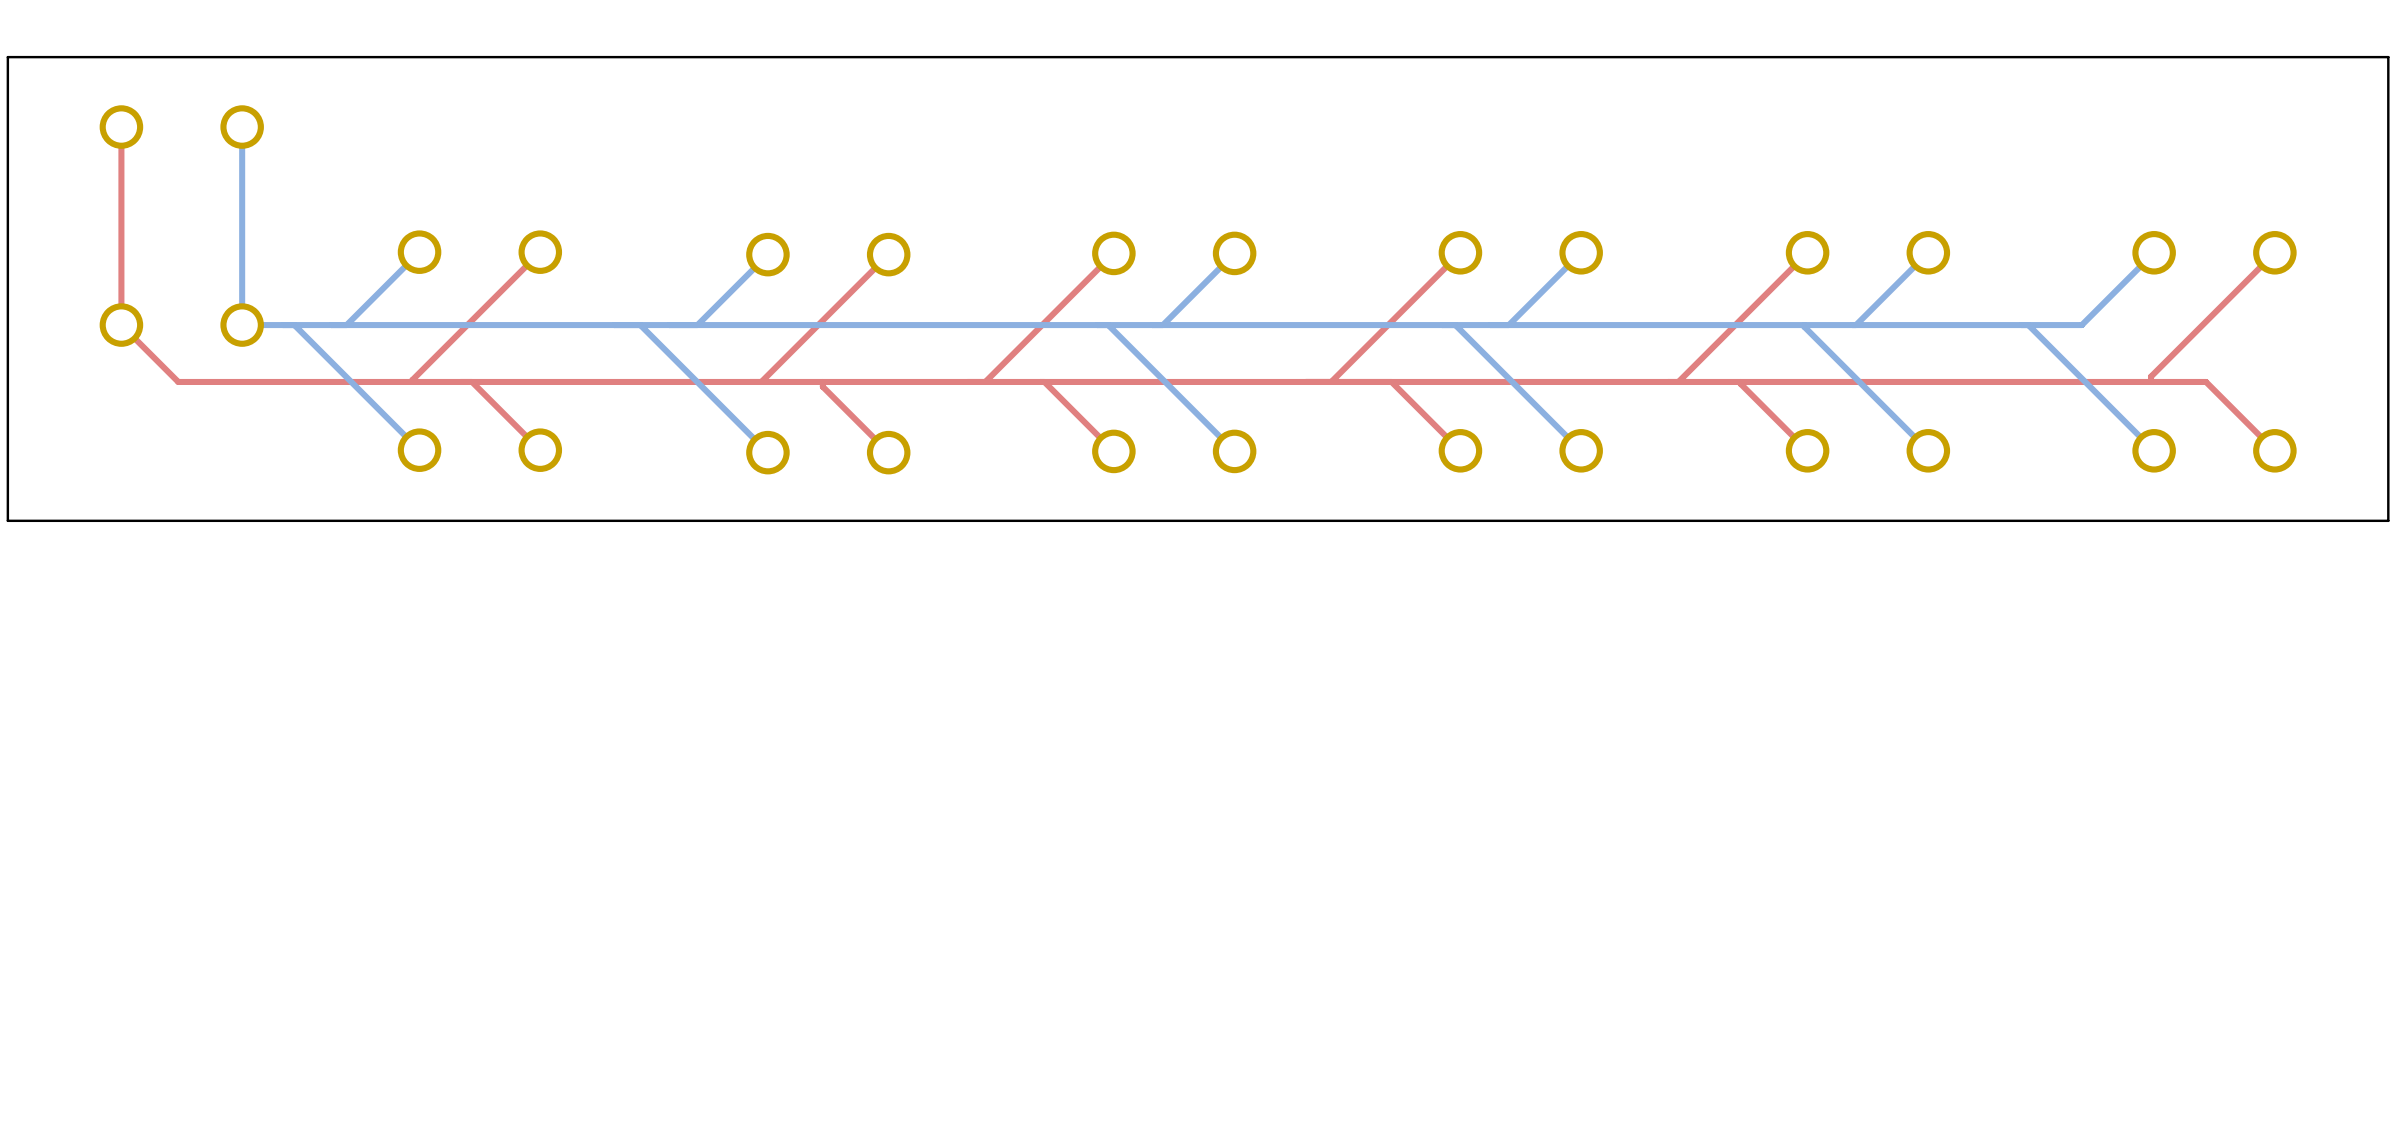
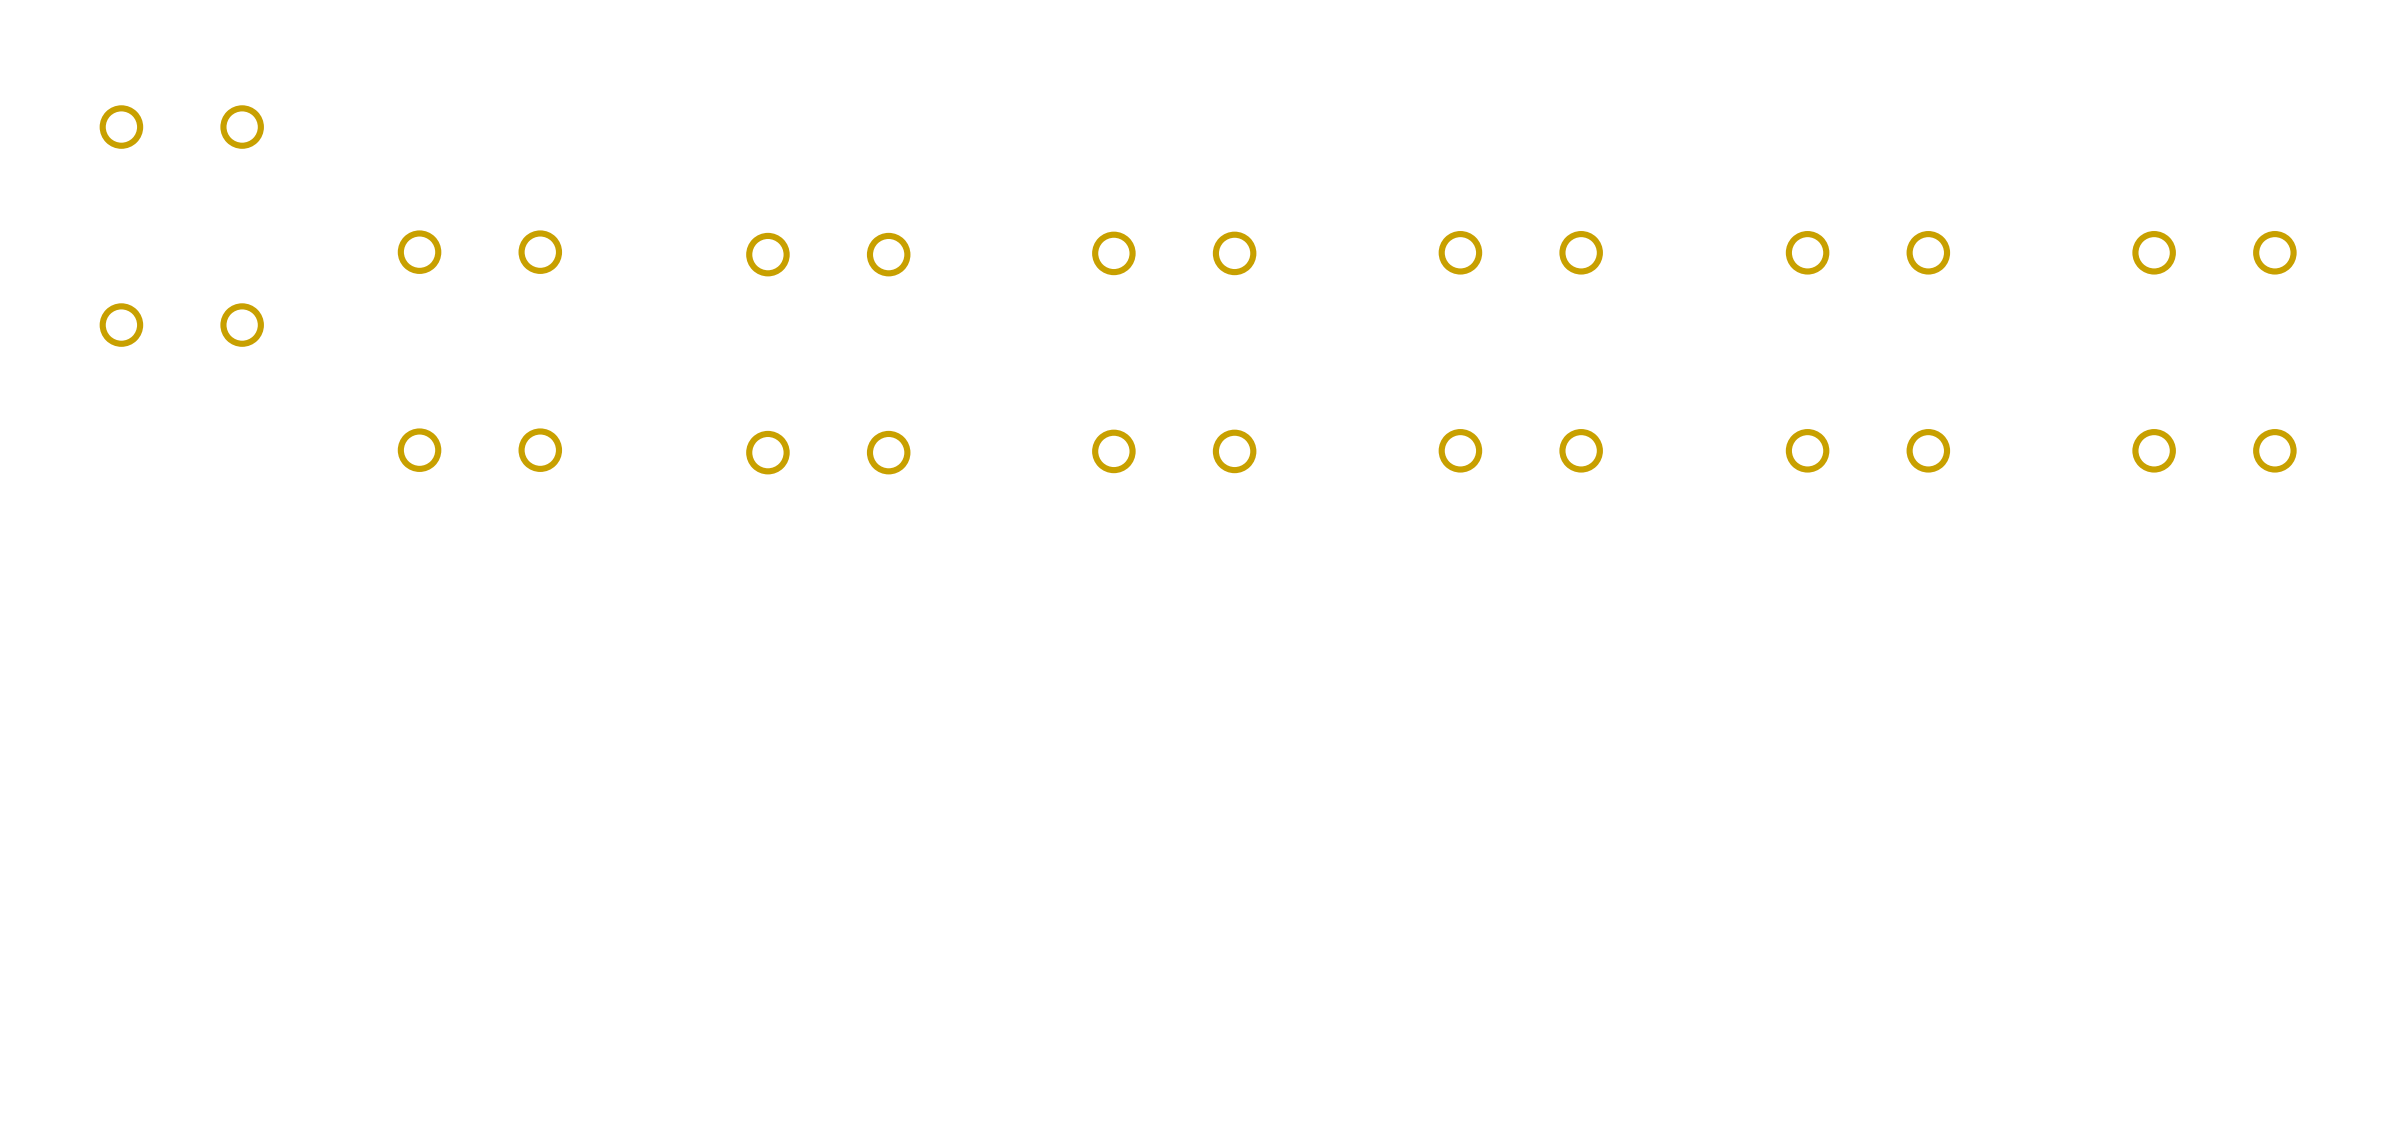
board edge: (2388, 57) (7, 57) (7, 520) (2388, 520) (2388, 57) -> none
top track: (121, 127) (121, 325) (178, 381) (2206, 381) (2274, 450) -> none
bottom track: (242, 127) (242, 325) (2081, 325) (2154, 252) -> none
bottom track: (419, 252) (346, 325) -> none
top track: (540, 252) (412, 381) -> none
top track: (1460, 252) (1331, 381) -> none
bottom track: (1581, 252) (1508, 325) -> none
top track: (1807, 252) (1678, 381) -> none
bottom track: (1928, 252) (1856, 325) -> none
top track: (2274, 252) (2151, 376) (2151, 381) -> none
top track: (1113, 253) (985, 381) -> none
bottom track: (1234, 253) (1162, 325) -> none
bottom track: (767, 254) (697, 325) -> none
top track: (888, 254) (761, 381) -> none
bottom track: (294, 325) (419, 450) -> none
bottom track: (640, 325) (767, 452) -> none
bottom track: (1108, 325) (1234, 451) -> none
bottom track: (1455, 325) (1581, 450) -> none
bottom track: (1804, 325) (1928, 450) -> none
bottom track: (2028, 325) (2154, 450) -> none
top track: (472, 381) (540, 450) -> none
top track: (822, 381) (822, 386) (888, 452) -> none
top track: (1044, 381) (1113, 451) -> none
top track: (1391, 381) (1460, 450) -> none
top track: (1740, 381) (1807, 450) -> none

